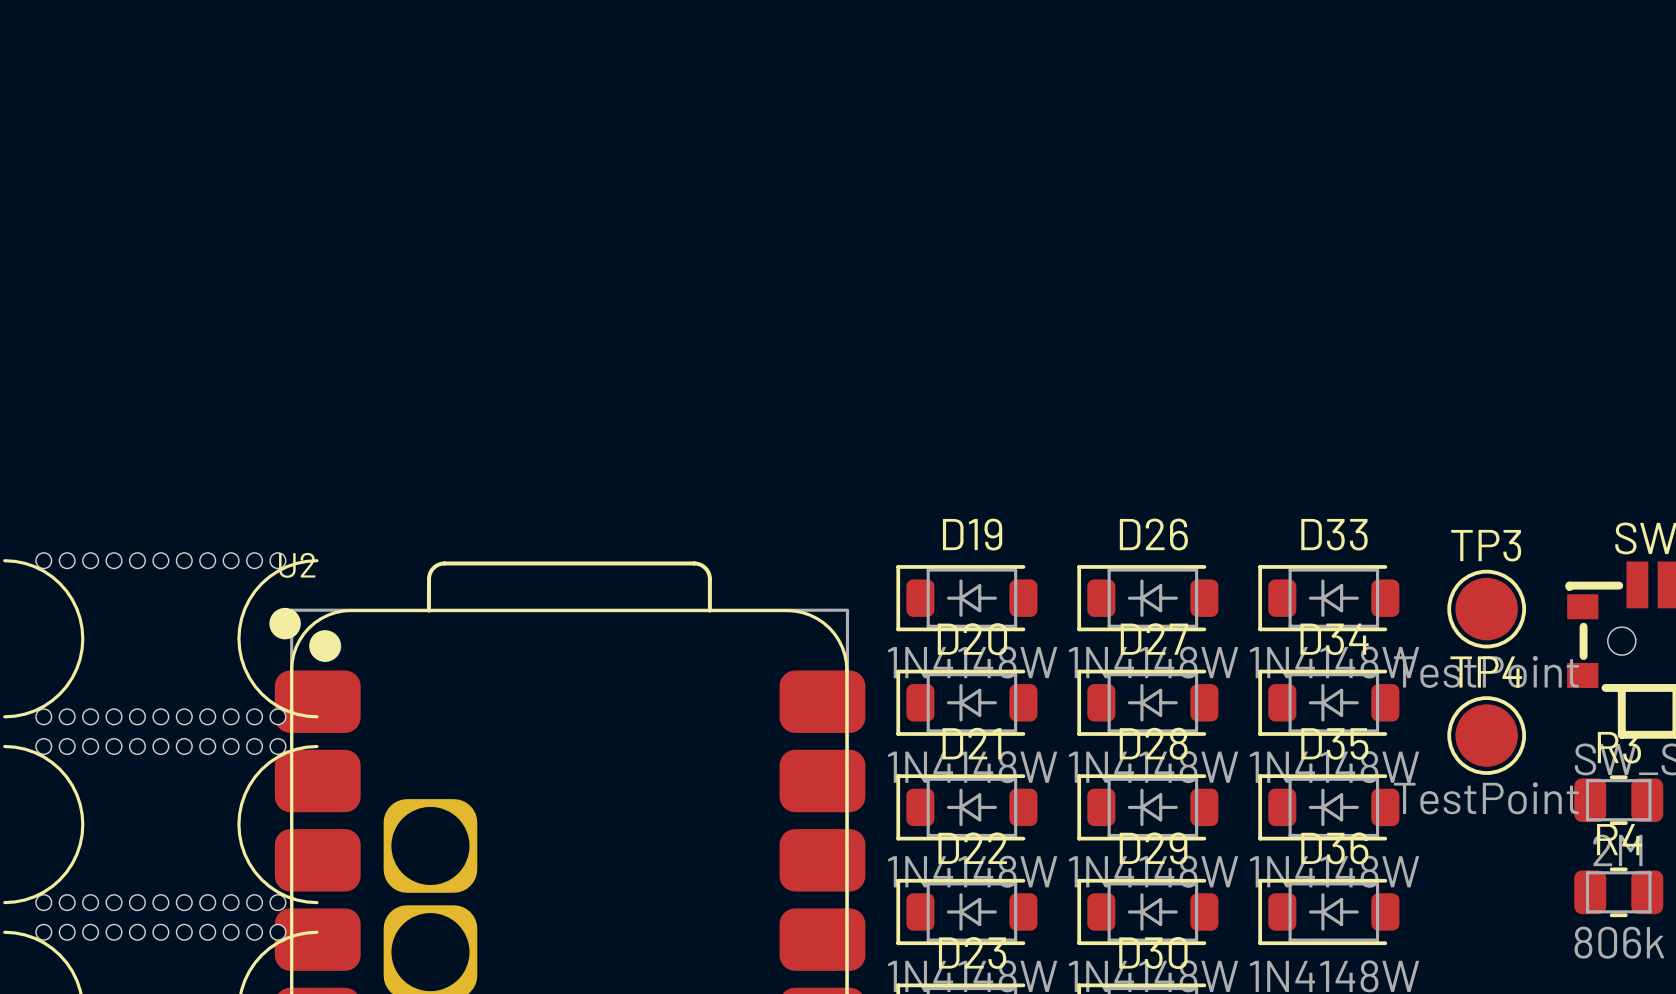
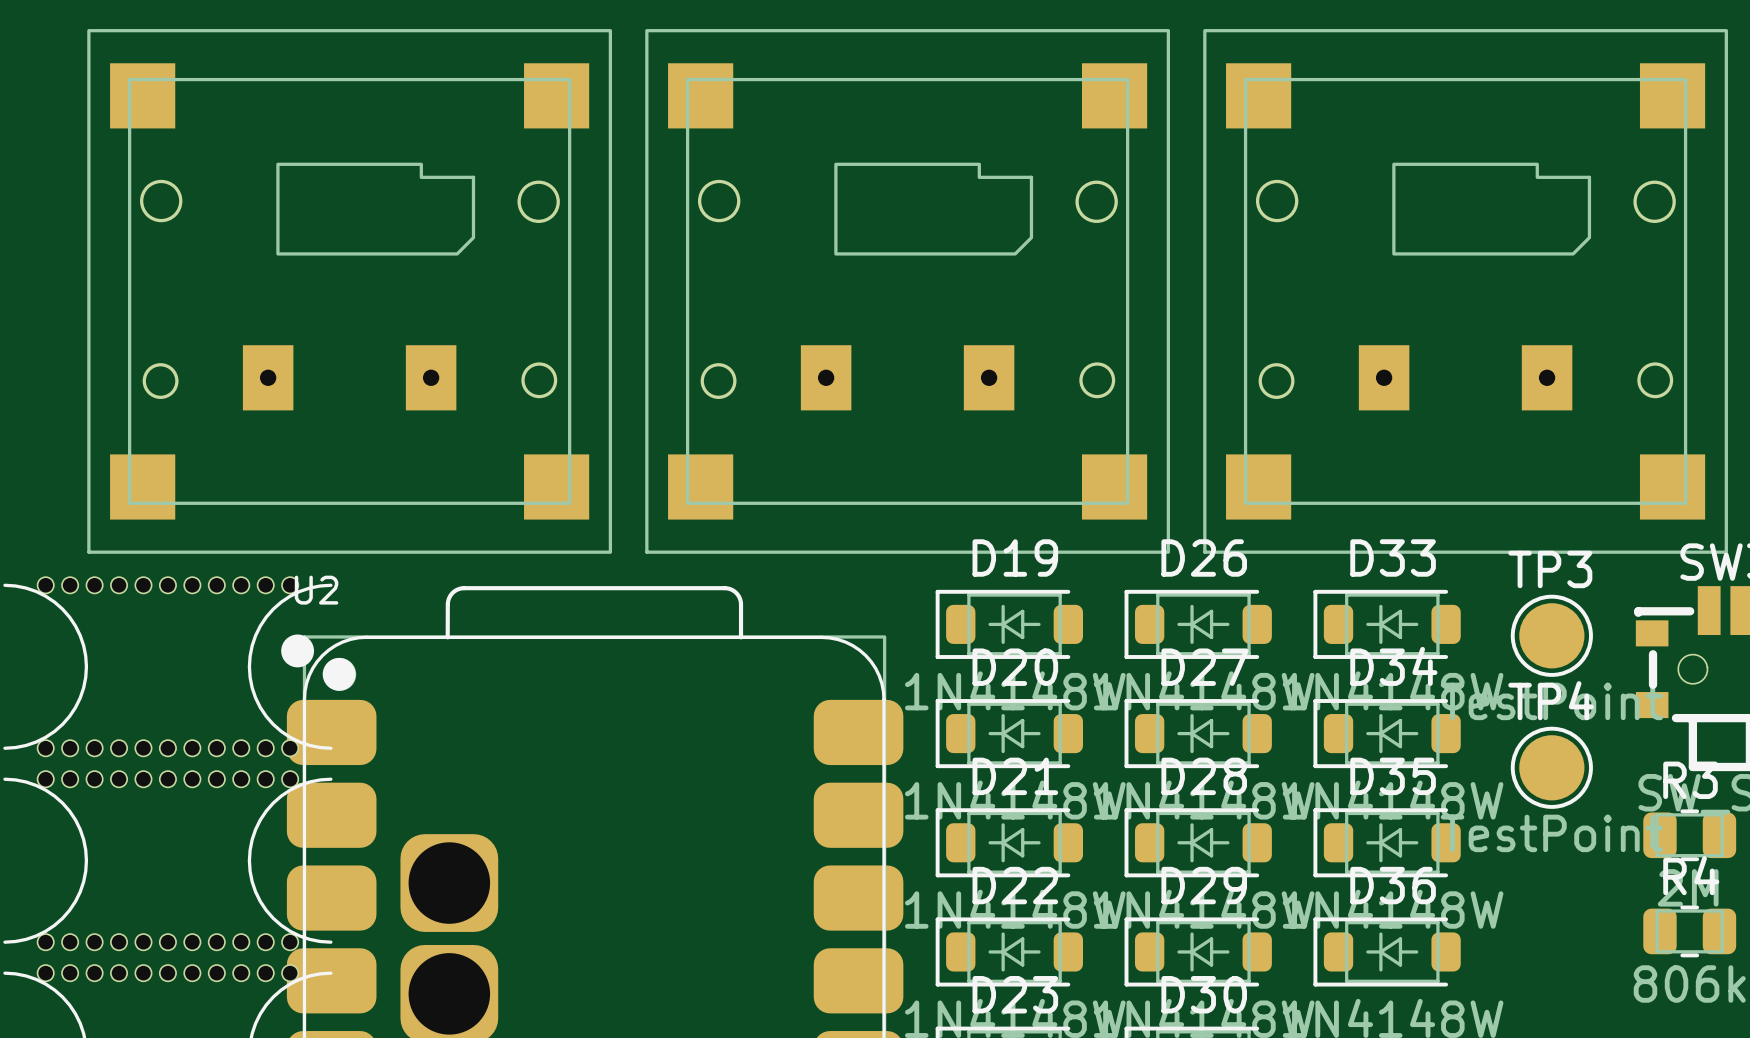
part: none -> (349, 291)
part: none -> (907, 291)
part: none -> (1465, 291)

